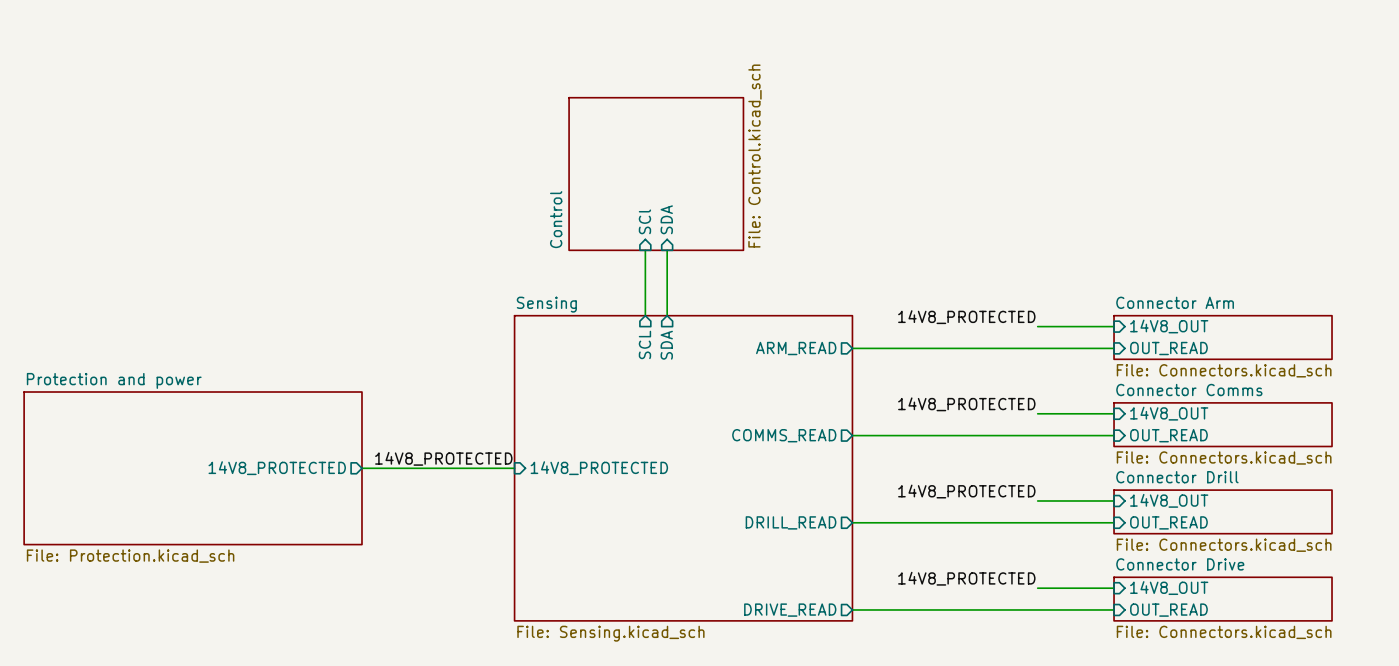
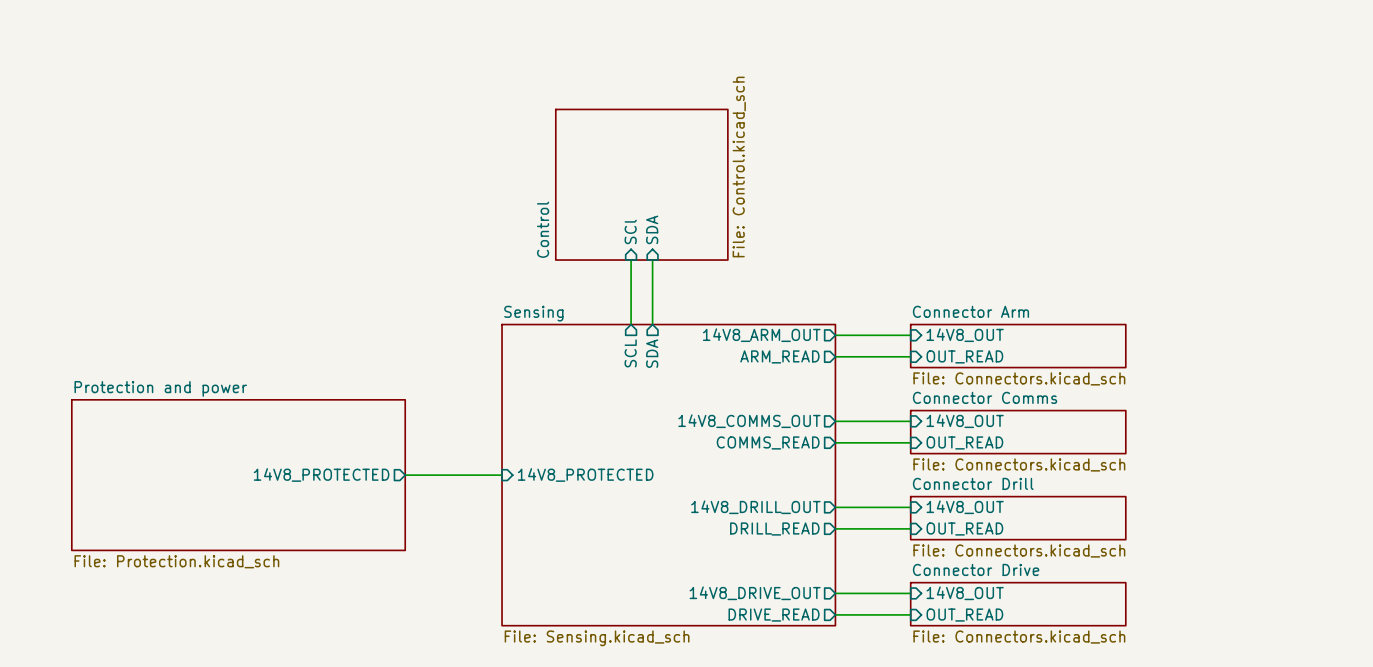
label: 14V8_PROTECTED (966, 317) -> none
sheet pin: none -> 14V8_ARM_OUT (761, 335)
sheet pin: none -> 14V8_OUT (965, 335)
wire: (1037, 326) (1114, 326) -> (835, 335) (910, 335)
sheet pin: 14V8_OUT (1169, 326) -> none
sheet Connector Arm position: (1223, 337) -> (1018, 346)
wire: (928, 348) (1114, 348) -> none
sheet pin: none -> OUT_READ (964, 356)
sheet pin: OUT_READ (1168, 348) -> none
label: 14V8_PROTECTED (966, 404) -> none
sheet pin: none -> 14V8_COMMS_OUT (749, 421)
sheet pin: none -> 14V8_OUT (965, 421)
wire: (1037, 413) (1114, 413) -> (835, 421) (910, 421)
sheet pin: 14V8_OUT (1169, 413) -> none
sheet Connector Comms position: (1223, 424) -> (1018, 432)
wire: (928, 435) (1114, 435) -> none
sheet pin: none -> OUT_READ (964, 442)
sheet pin: OUT_READ (1168, 435) -> none
label: 14V8_PROTECTED (443, 458) -> none
sheet Protection and power position: (193, 468) -> (238, 475)
sheet pin position: 14V8_PROTECTED (277, 468) -> 14V8_PROTECTED (321, 474)
wire: (361, 468) (416, 468) -> none
label: 14V8_PROTECTED (966, 491) -> none
sheet pin: none -> 14V8_DRILL_OUT (755, 507)
sheet pin: none -> 14V8_OUT (965, 507)
wire: (1037, 500) (1114, 500) -> (835, 507) (910, 507)
sheet pin: 14V8_OUT (1169, 500) -> none
sheet Connector Drill position: (1223, 511) -> (1018, 518)
wire: (928, 522) (1114, 522) -> none
sheet pin: none -> OUT_READ (964, 529)
sheet pin: OUT_READ (1168, 522) -> none
label: 14V8_PROTECTED (966, 578) -> none
sheet pin: none -> 14V8_DRIVE_OUT (755, 593)
sheet pin: none -> 14V8_OUT (965, 593)
wire: (1037, 588) (1114, 588) -> (835, 593) (910, 593)
sheet pin: 14V8_OUT (1169, 588) -> none
sheet Connector Drive position: (1223, 599) -> (1018, 604)
wire: (928, 609) (1114, 609) -> none
sheet pin: none -> OUT_READ (964, 615)
sheet pin: OUT_READ (1168, 610) -> none

